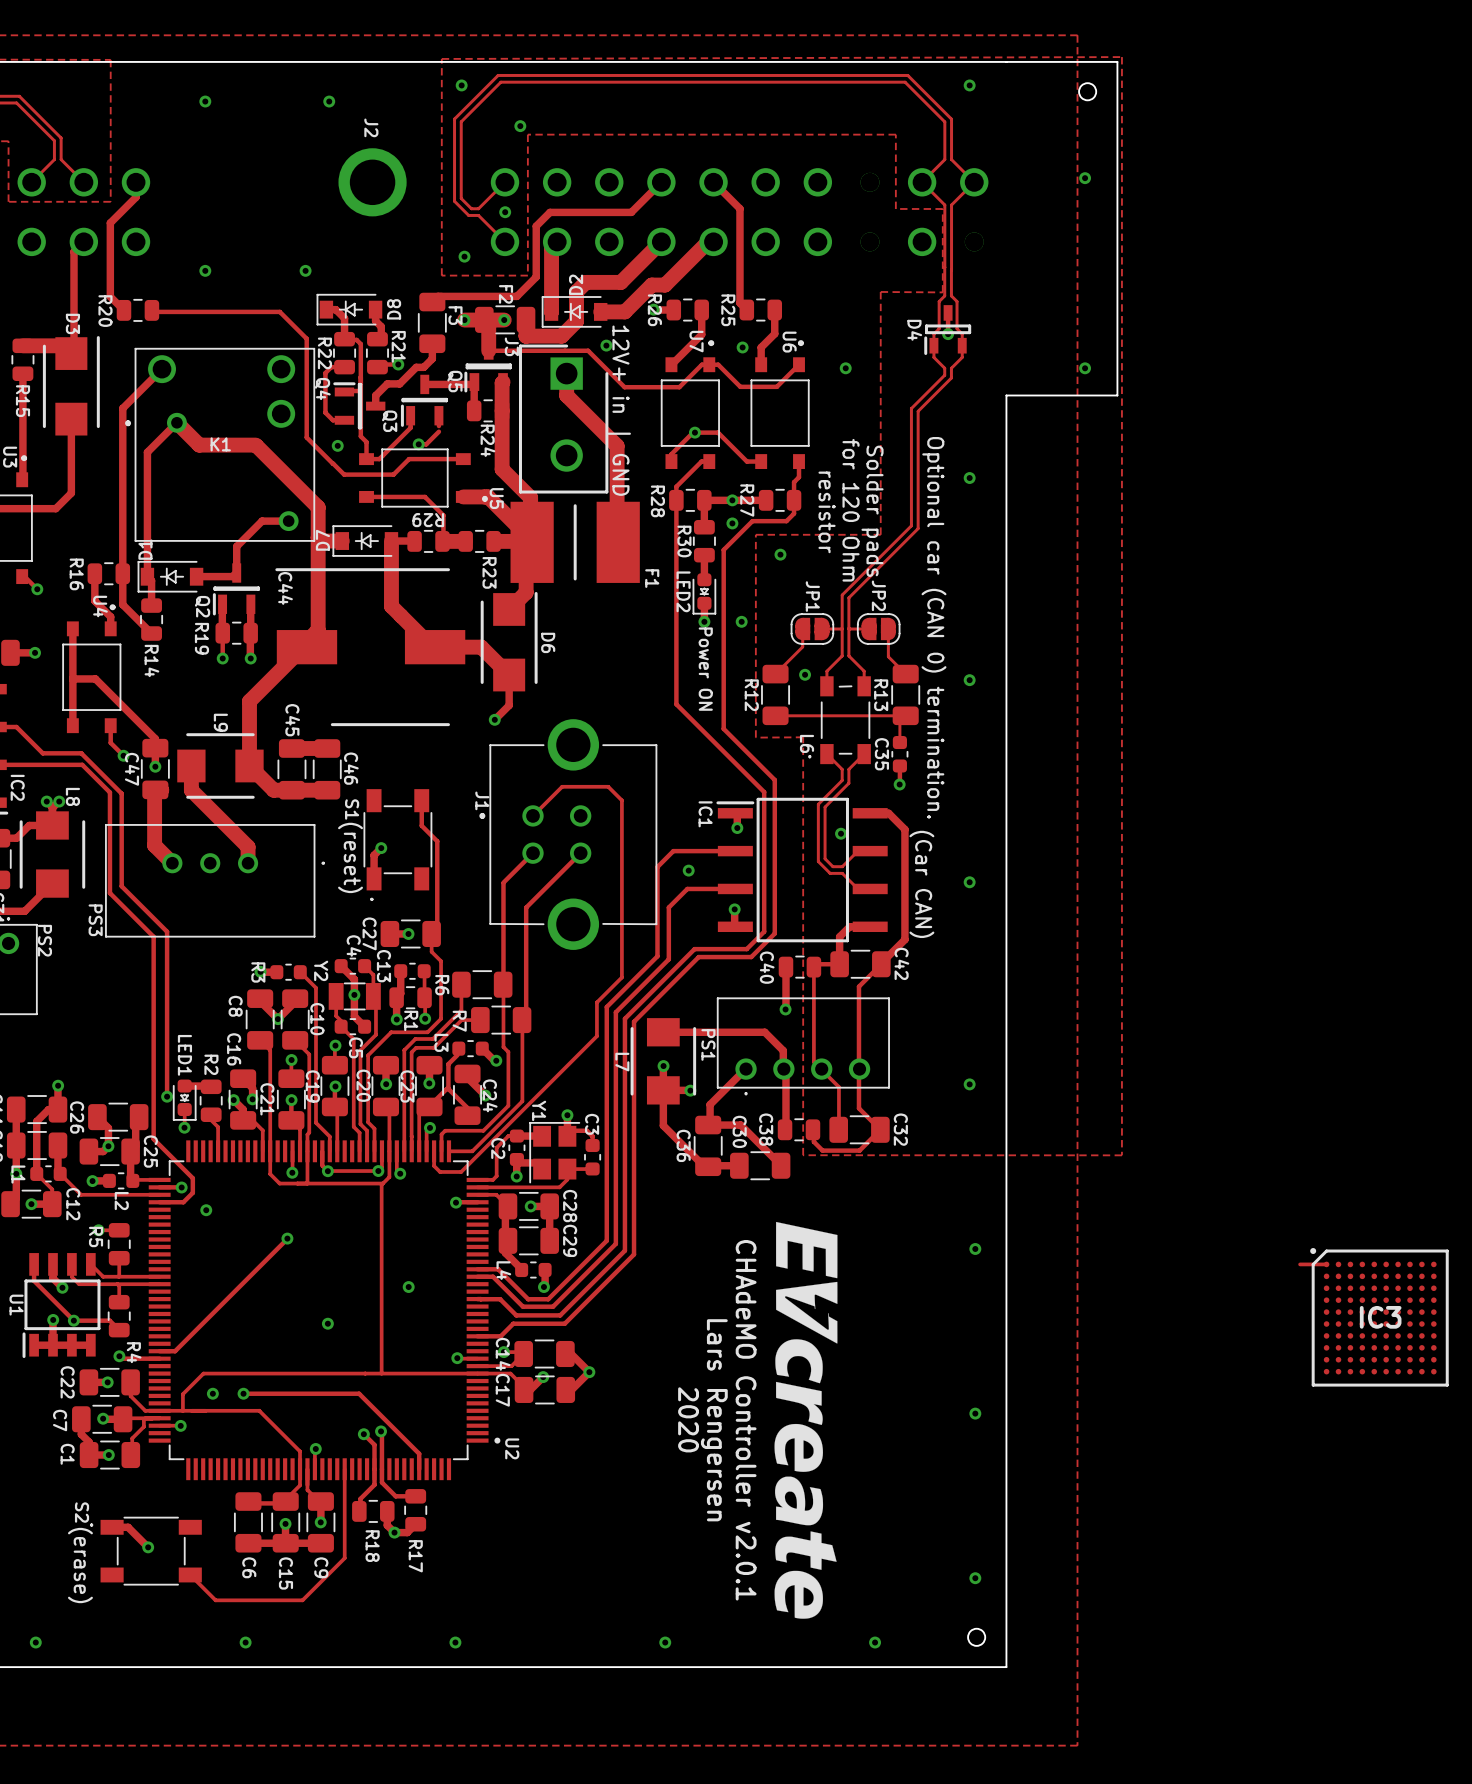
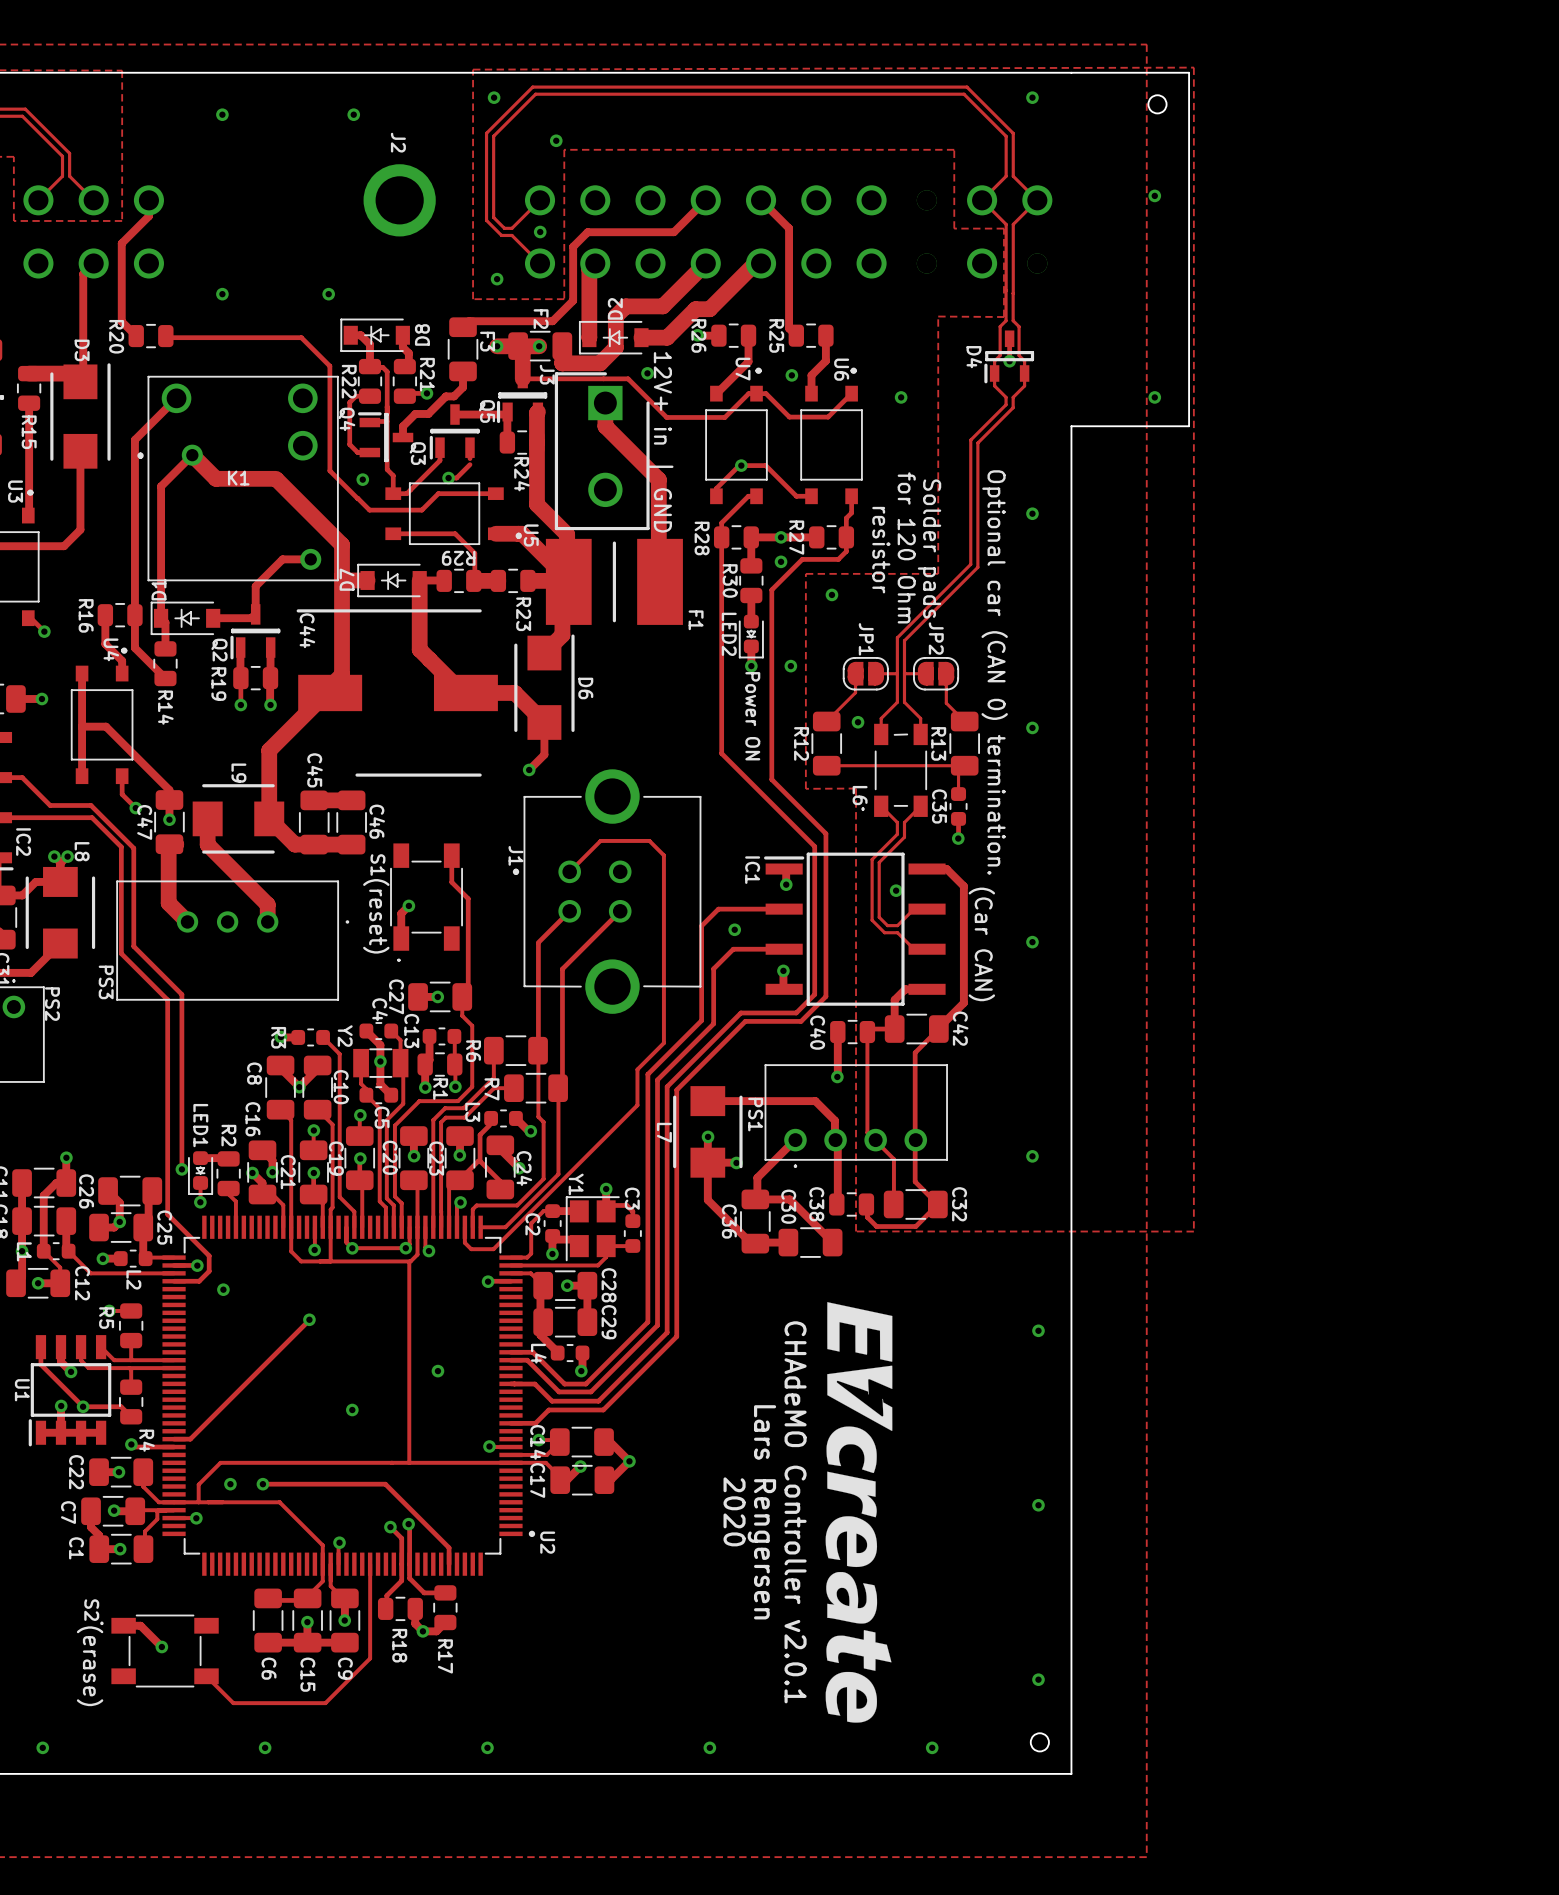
track: (1300, 1264) (1326, 1264) -> none
IC3: (1379, 1317) -> none

